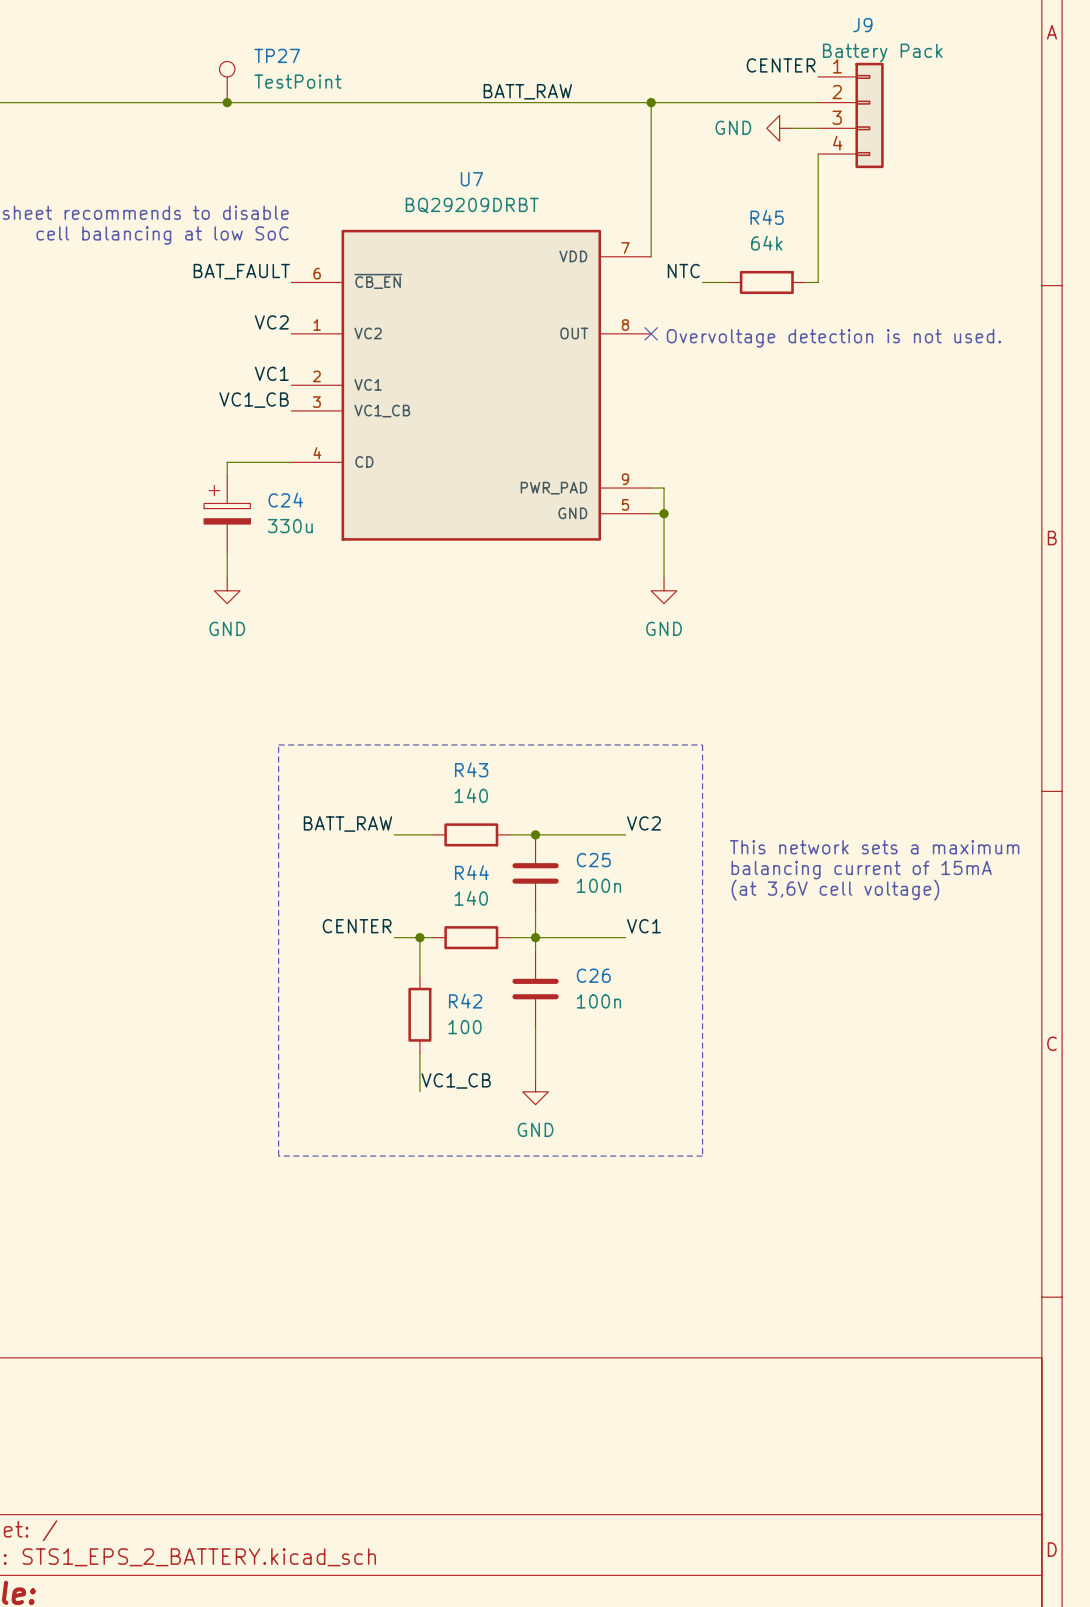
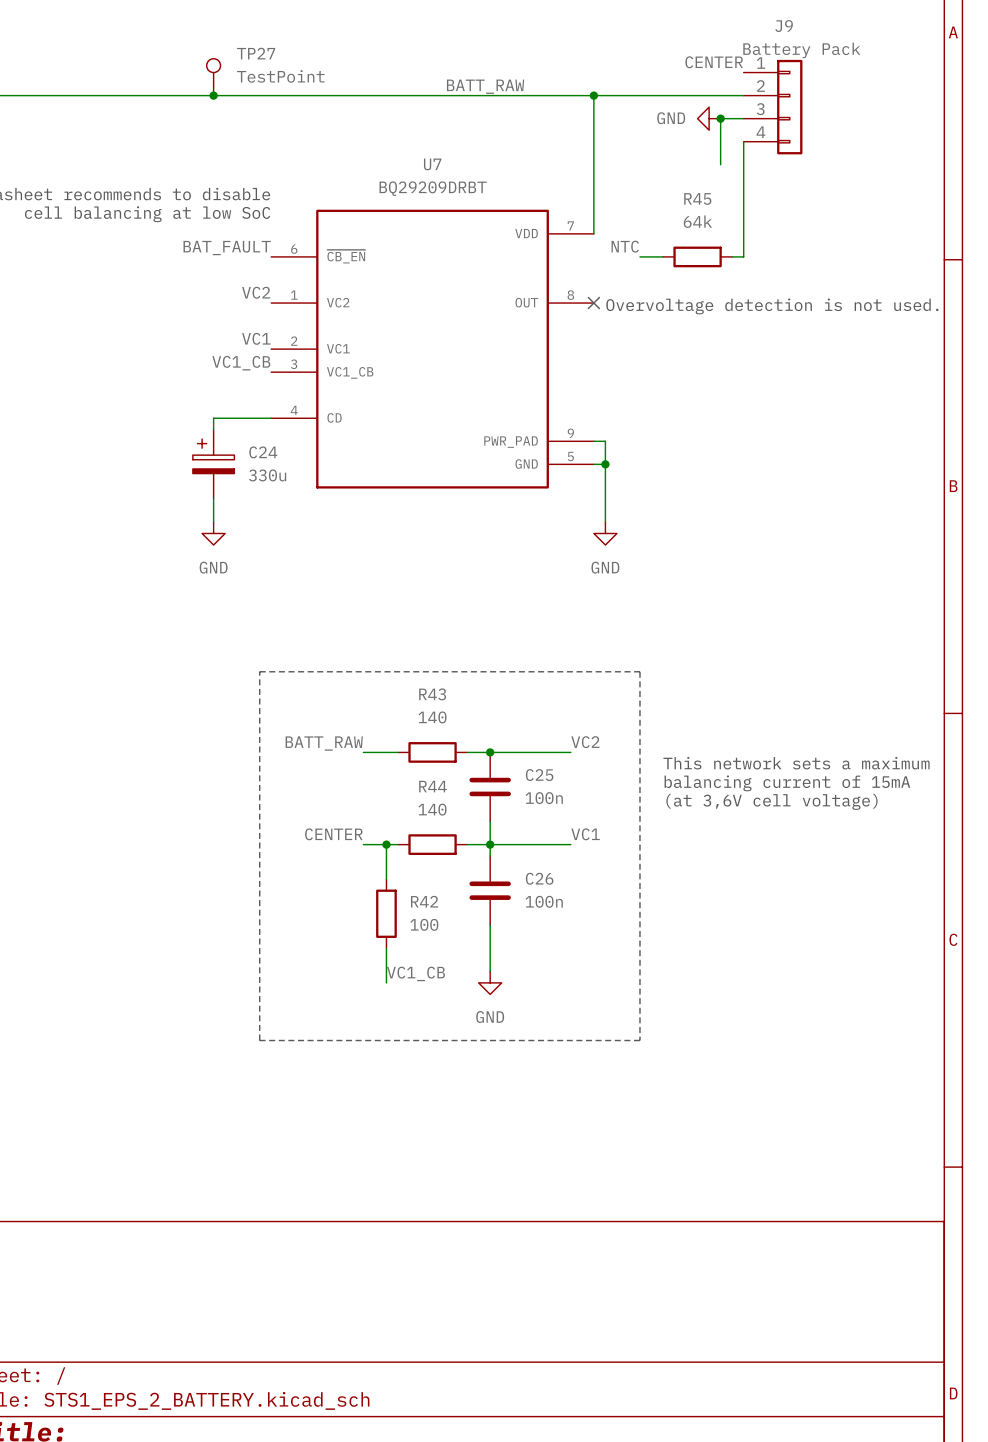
wire: none -> (720, 118) (720, 164)
junction: none -> (720, 118)

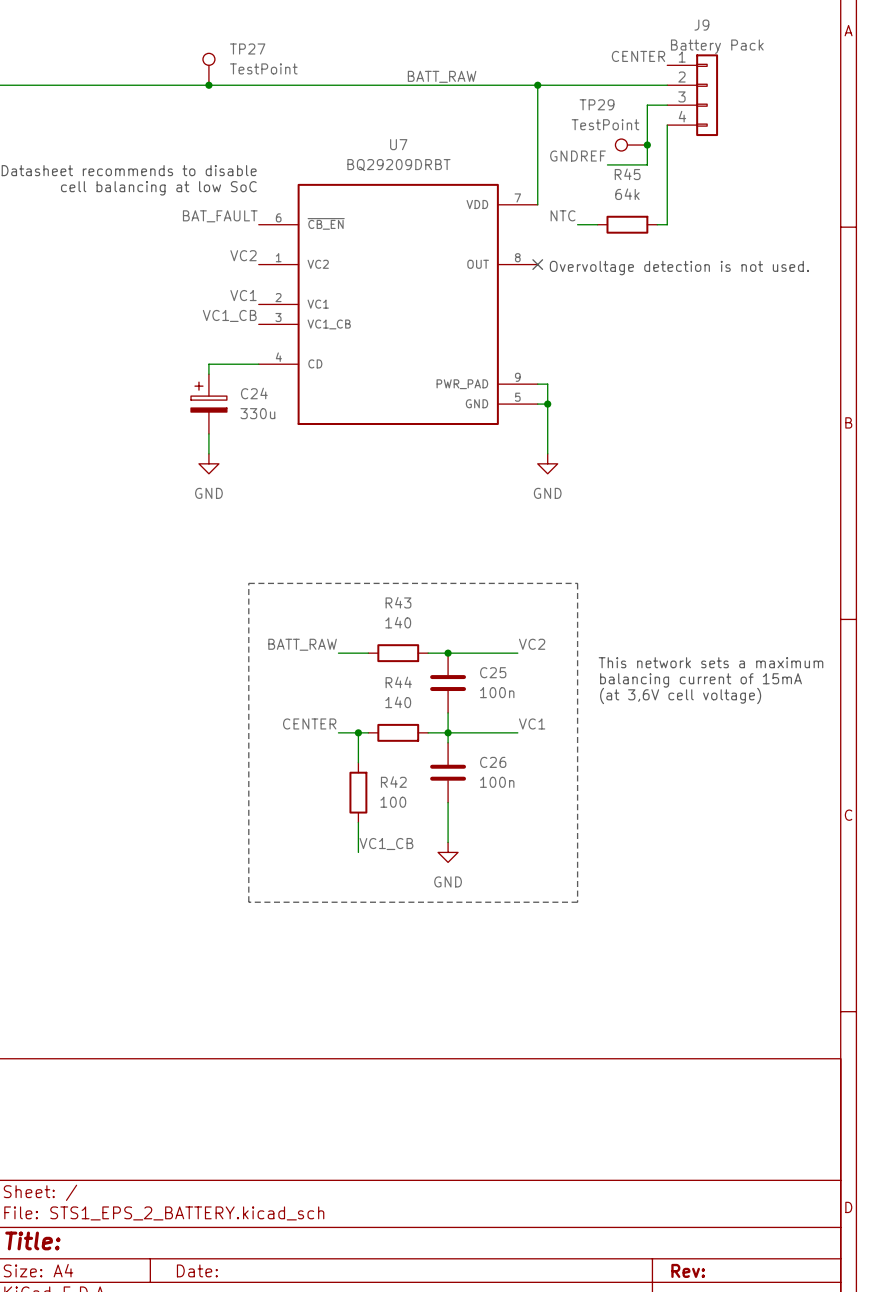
power symbol: GND (709, 118) -> none
junction position: (720, 118) -> (647, 145)
TP29: none -> TestPoint (631, 145)
wire: none -> (647, 145) (647, 164) (607, 164)
label: none -> GNDREF (577, 156)

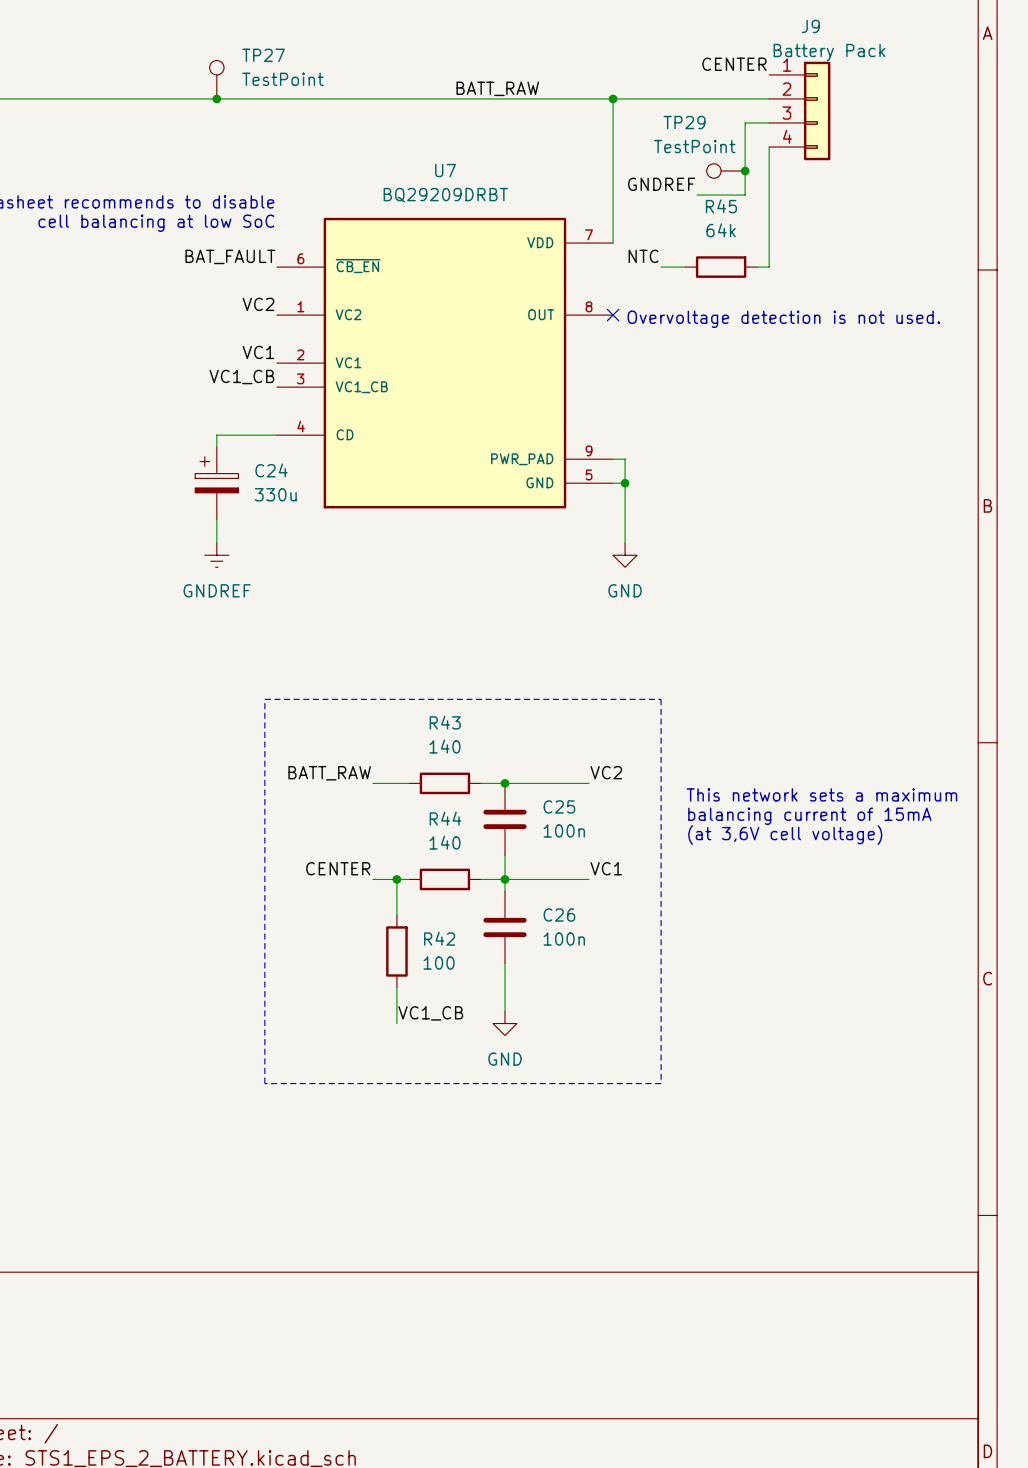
power symbol: GND (208, 463) -> GNDREF (216, 555)

